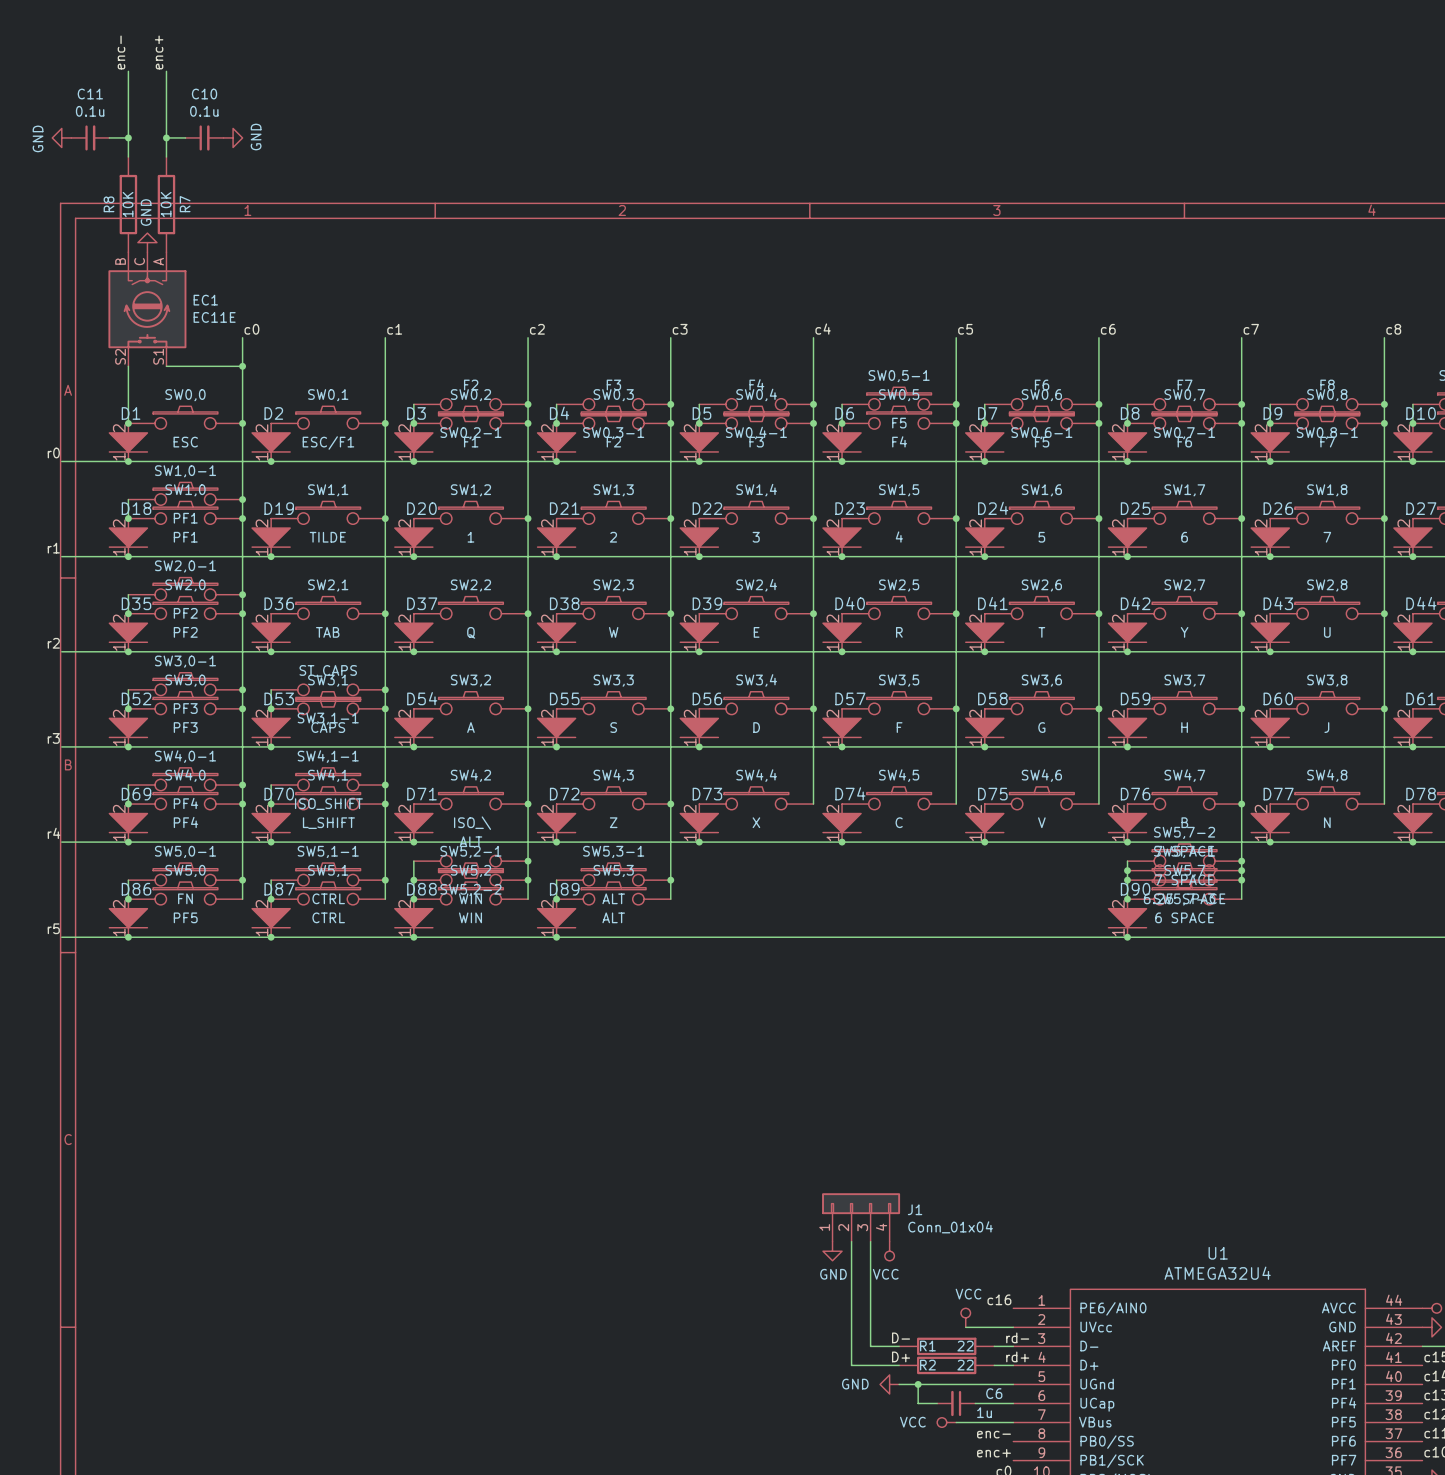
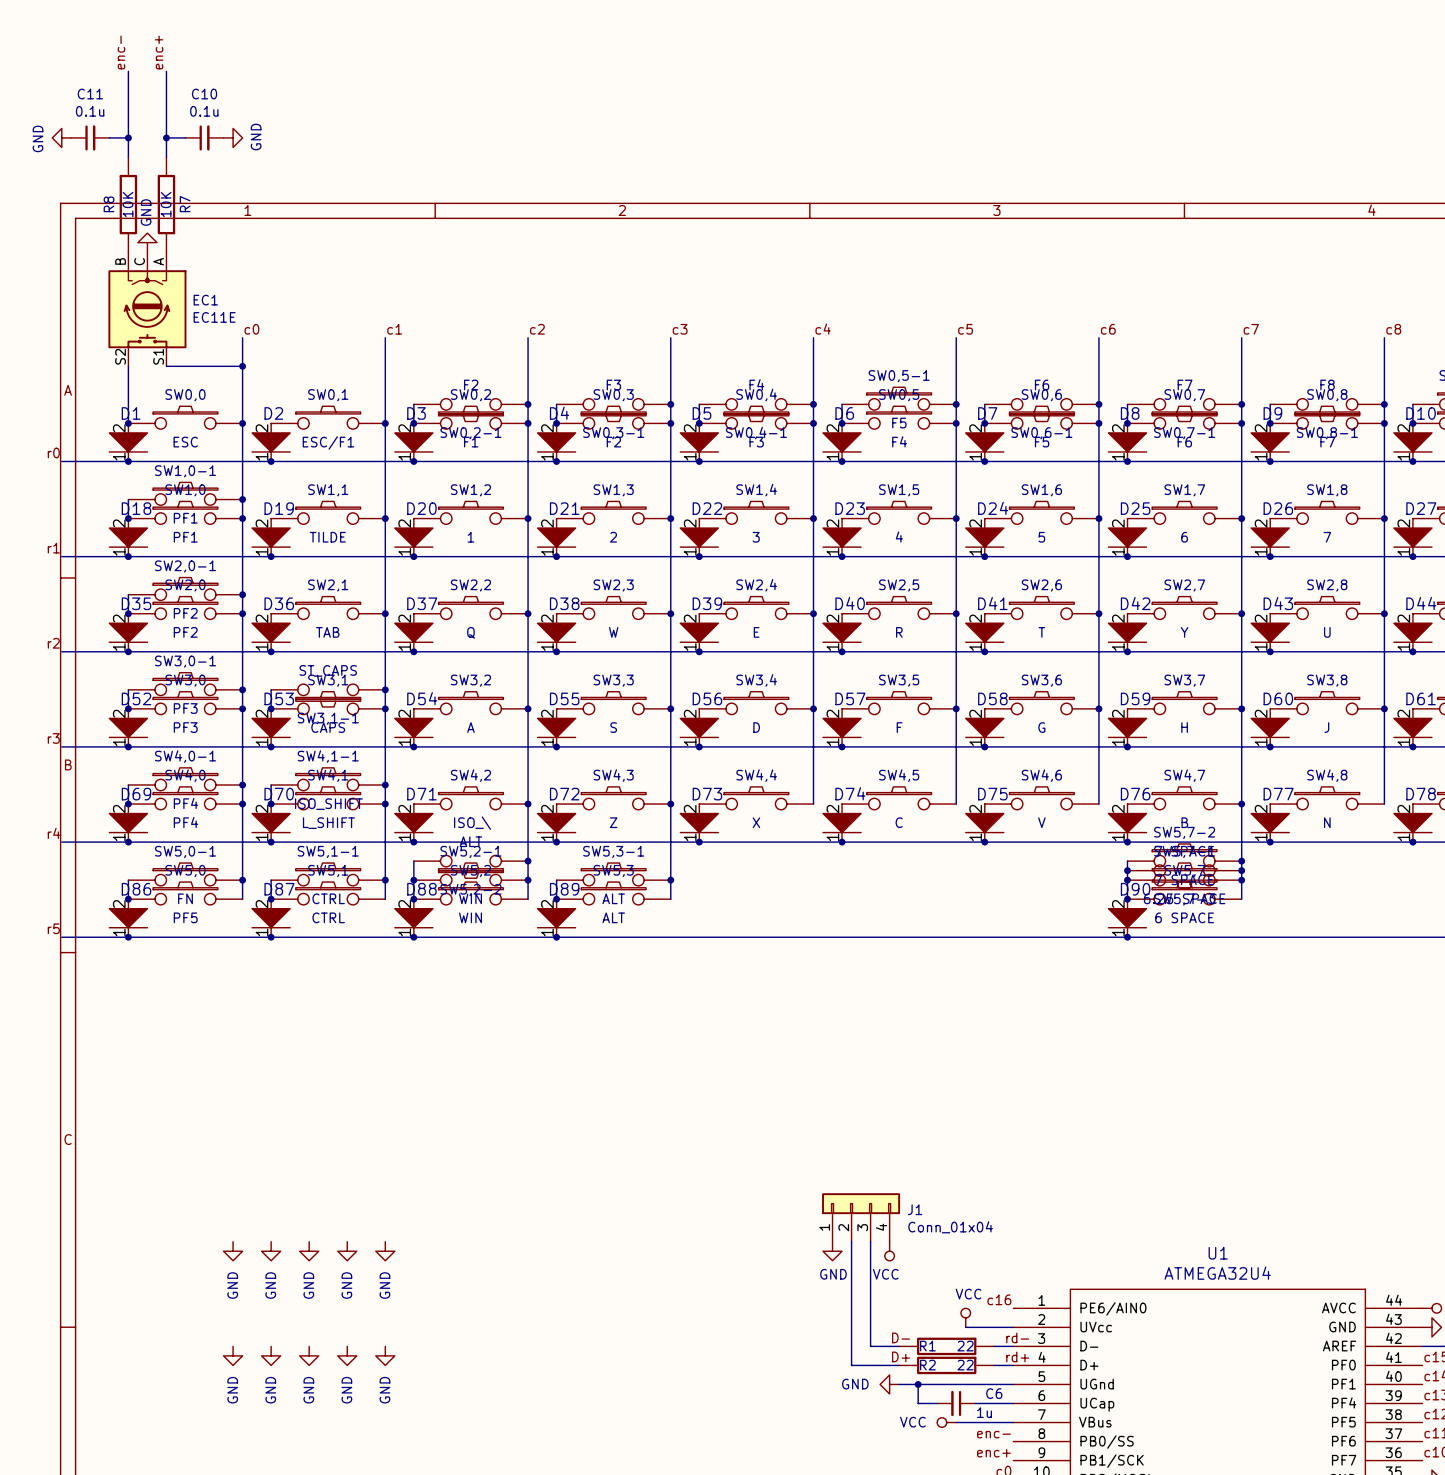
power symbol: none -> GND (233, 1251)
power symbol: none -> GND (271, 1251)
power symbol: none -> GND (309, 1251)
power symbol: none -> GND (347, 1251)
power symbol: none -> GND (385, 1251)
power symbol: none -> GND (233, 1355)
power symbol: none -> GND (271, 1355)
power symbol: none -> GND (309, 1355)
power symbol: none -> GND (347, 1355)
power symbol: none -> GND (385, 1355)

